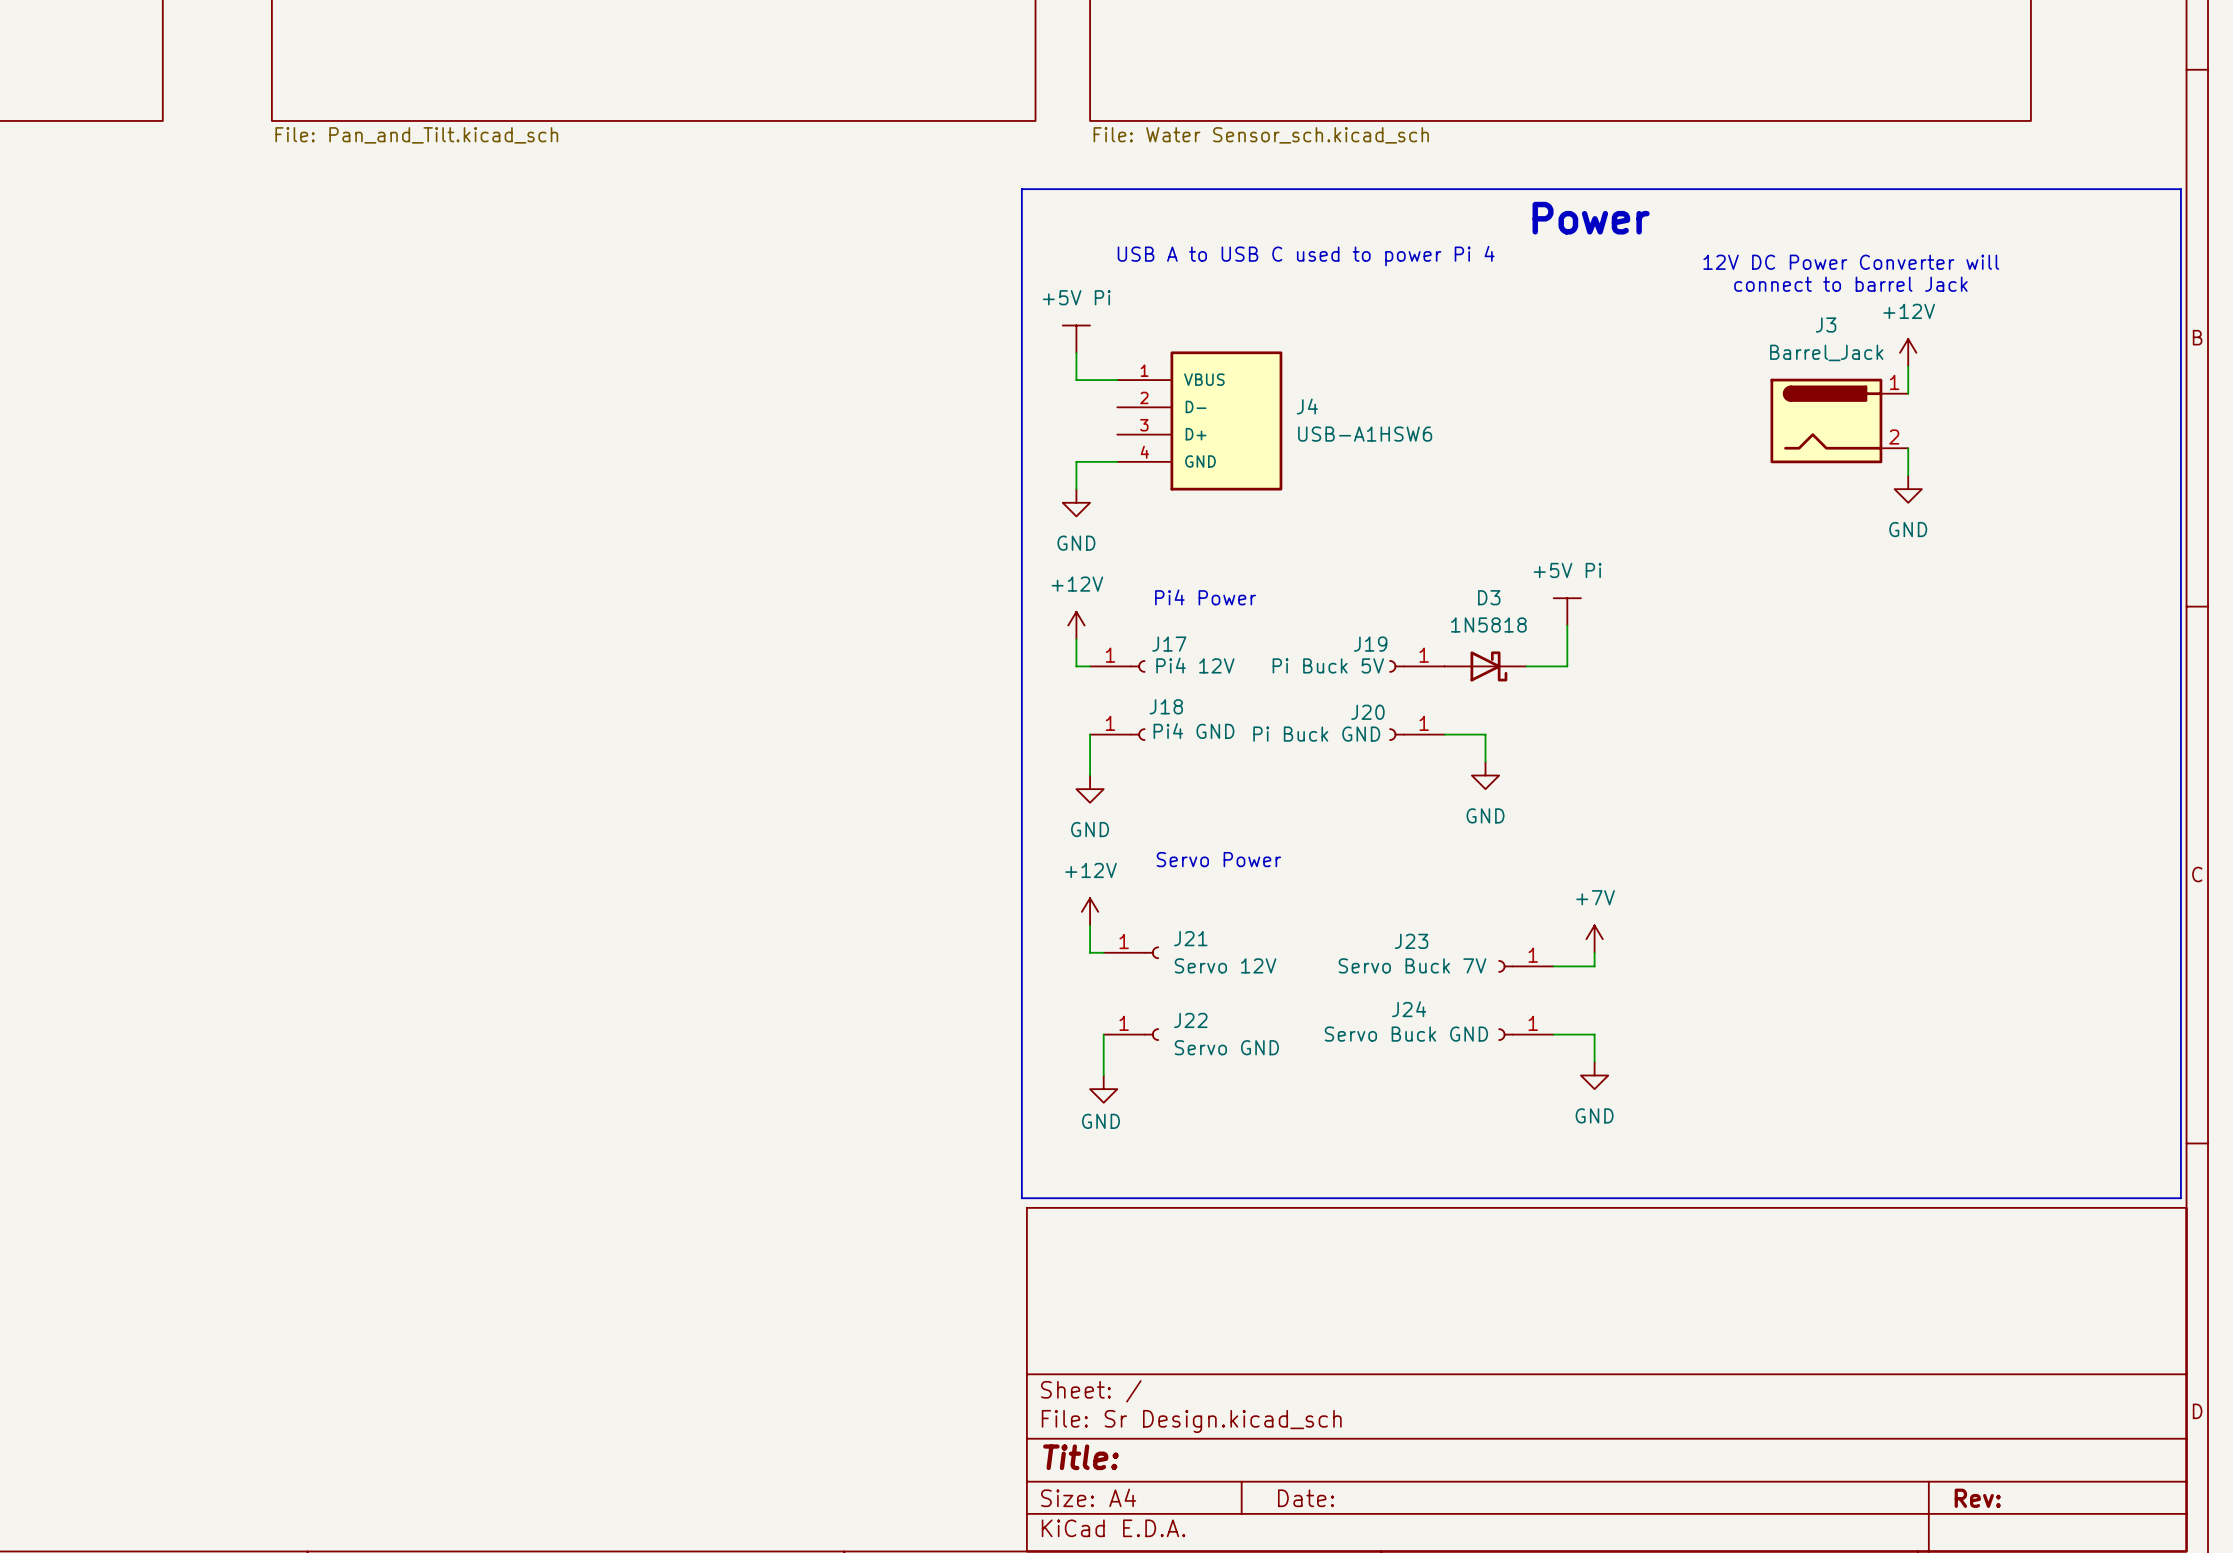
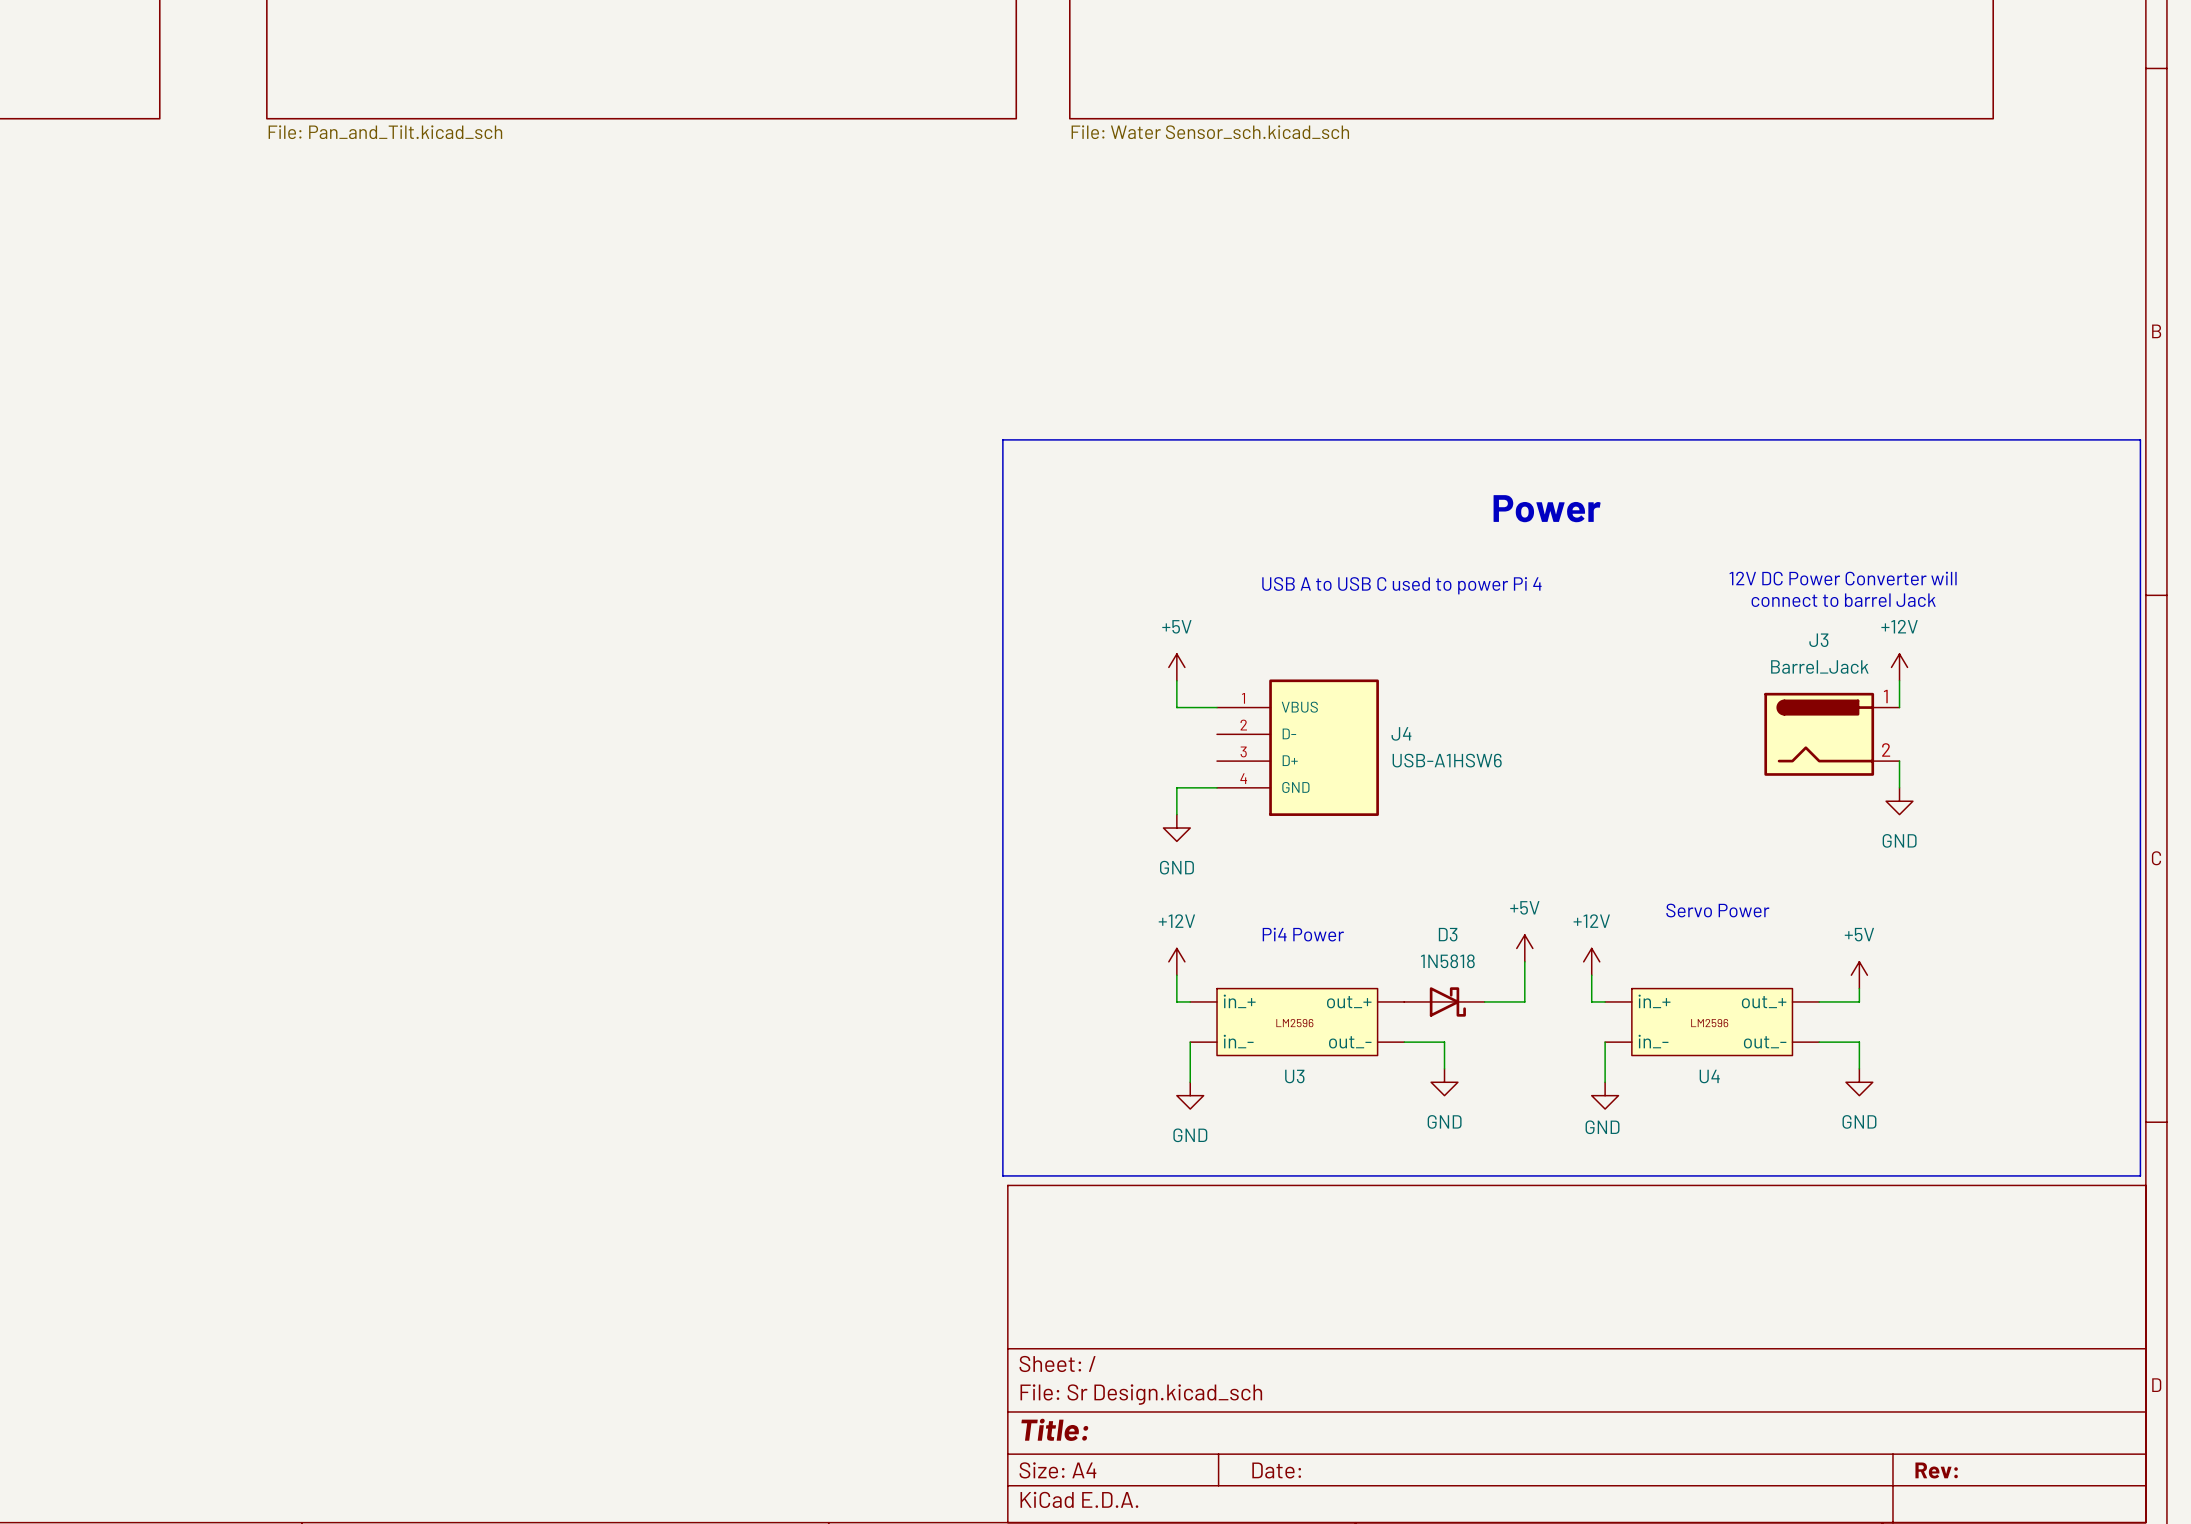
text: Power (1591, 218) -> none
text: USB A to USB C used to power Pi 4 (1306, 256) -> none
text: 12V DC Power Converter will (1851, 262) -> none
text: connect to barrel Jack (1850, 284) -> none
power symbol: +5V Pi (1076, 339) -> none
wire: (1076, 352) (1076, 380) (1117, 380) -> none
power symbol: +12V (1908, 352) -> none
wire: (1908, 366) (1908, 393) -> none
J4 position: (1199, 420) -> (1297, 747)
J3 position: (1839, 420) -> (1831, 734)
line: (1021, 448) (1021, 189) (2180, 189) (2180, 448) -> (1002, 439) (2140, 439)
wire: (1908, 448) (1908, 475) -> (1899, 680) (1899, 707)
wire: (1117, 461) (1076, 461) (1076, 489) -> none
power symbol: GND (1908, 489) -> none
power symbol: GND (1076, 502) -> none
text: none -> Power (1547, 508)
text: none -> 12V DC Power Converter will (1843, 578)
text: none -> USB A to USB C used to power Pi 4 (1401, 585)
text: Pi4 Power (1205, 597) -> none
power symbol: +5V Pi (1567, 611) -> none
text: none -> connect to barrel Jack (1843, 600)
power symbol: +12V (1076, 625) -> none
wire: (1567, 625) (1567, 666) (1526, 666) -> none
wire: (1076, 639) (1076, 666) (1090, 666) -> none
J17: Pi4 12V (1117, 666) -> none
J19: Pi Buck 5V (1416, 666) -> none
D3 position: (1485, 666) -> (1444, 1001)
power symbol: none -> +5V (1176, 667)
power symbol: none -> +12V (1899, 667)
wire: none -> (1176, 680) (1176, 707) (1217, 707)
wire: (1090, 734) (1090, 775) -> none
J18: Pi4 GND (1117, 734) -> none
J20: Pi Buck GND (1416, 734) -> none
wire: (1444, 734) (1485, 734) (1485, 761) -> none
power symbol: GND (1485, 775) -> none
wire: none -> (1899, 761) (1899, 787)
power symbol position: GND (1090, 789) -> GND (1176, 828)
wire: none -> (1217, 787) (1176, 787) (1176, 814)
power symbol: none -> GND (1899, 801)
text: Servo Power (1218, 859) -> none
power symbol position: +12V (1090, 911) -> +12V (1176, 961)
wire: (1090, 925) (1090, 952) (1103, 952) -> (1176, 975) (1176, 1001) (1190, 1001)
text: none -> Servo Power (1717, 910)
power symbol: +7V (1594, 939) -> none
text: none -> Pi4 Power (1303, 934)
J21: Servo 12V (1131, 952) -> none
wire: (1594, 952) (1594, 966) (1553, 966) -> none
J23: Servo Buck 7V (1526, 966) -> none
power symbol: none -> +5V (1524, 948)
wire: none -> (1524, 961) (1524, 1001) (1484, 1001)
power symbol: none -> +12V (1591, 961)
wire: none -> (1591, 975) (1591, 1001) (1605, 1001)
power symbol: none -> +5V (1859, 975)
wire: none -> (1859, 988) (1859, 1001) (1819, 1001)
wire: (1103, 1034) (1103, 1075) -> (1190, 1042) (1190, 1082)
J22: Servo GND (1131, 1034) -> none
J24: Servo Buck GND (1526, 1034) -> none
wire: (1553, 1034) (1594, 1034) (1594, 1061) -> (1404, 1042) (1444, 1042) (1444, 1068)
U3: none -> (1297, 1022)
U4: none -> (1712, 1022)
wire: none -> (1605, 1042) (1605, 1082)
wire: none -> (1819, 1042) (1859, 1042) (1859, 1068)
power symbol position: GND (1594, 1075) -> GND (1605, 1095)
power symbol position: GND (1103, 1089) -> GND (1190, 1095)
power symbol: none -> GND (1444, 1082)
power symbol: none -> GND (1859, 1082)
power symbol text position: GND (1594, 1115) -> GND (1602, 1127)
power symbol text position: GND (1100, 1121) -> GND (1190, 1135)

